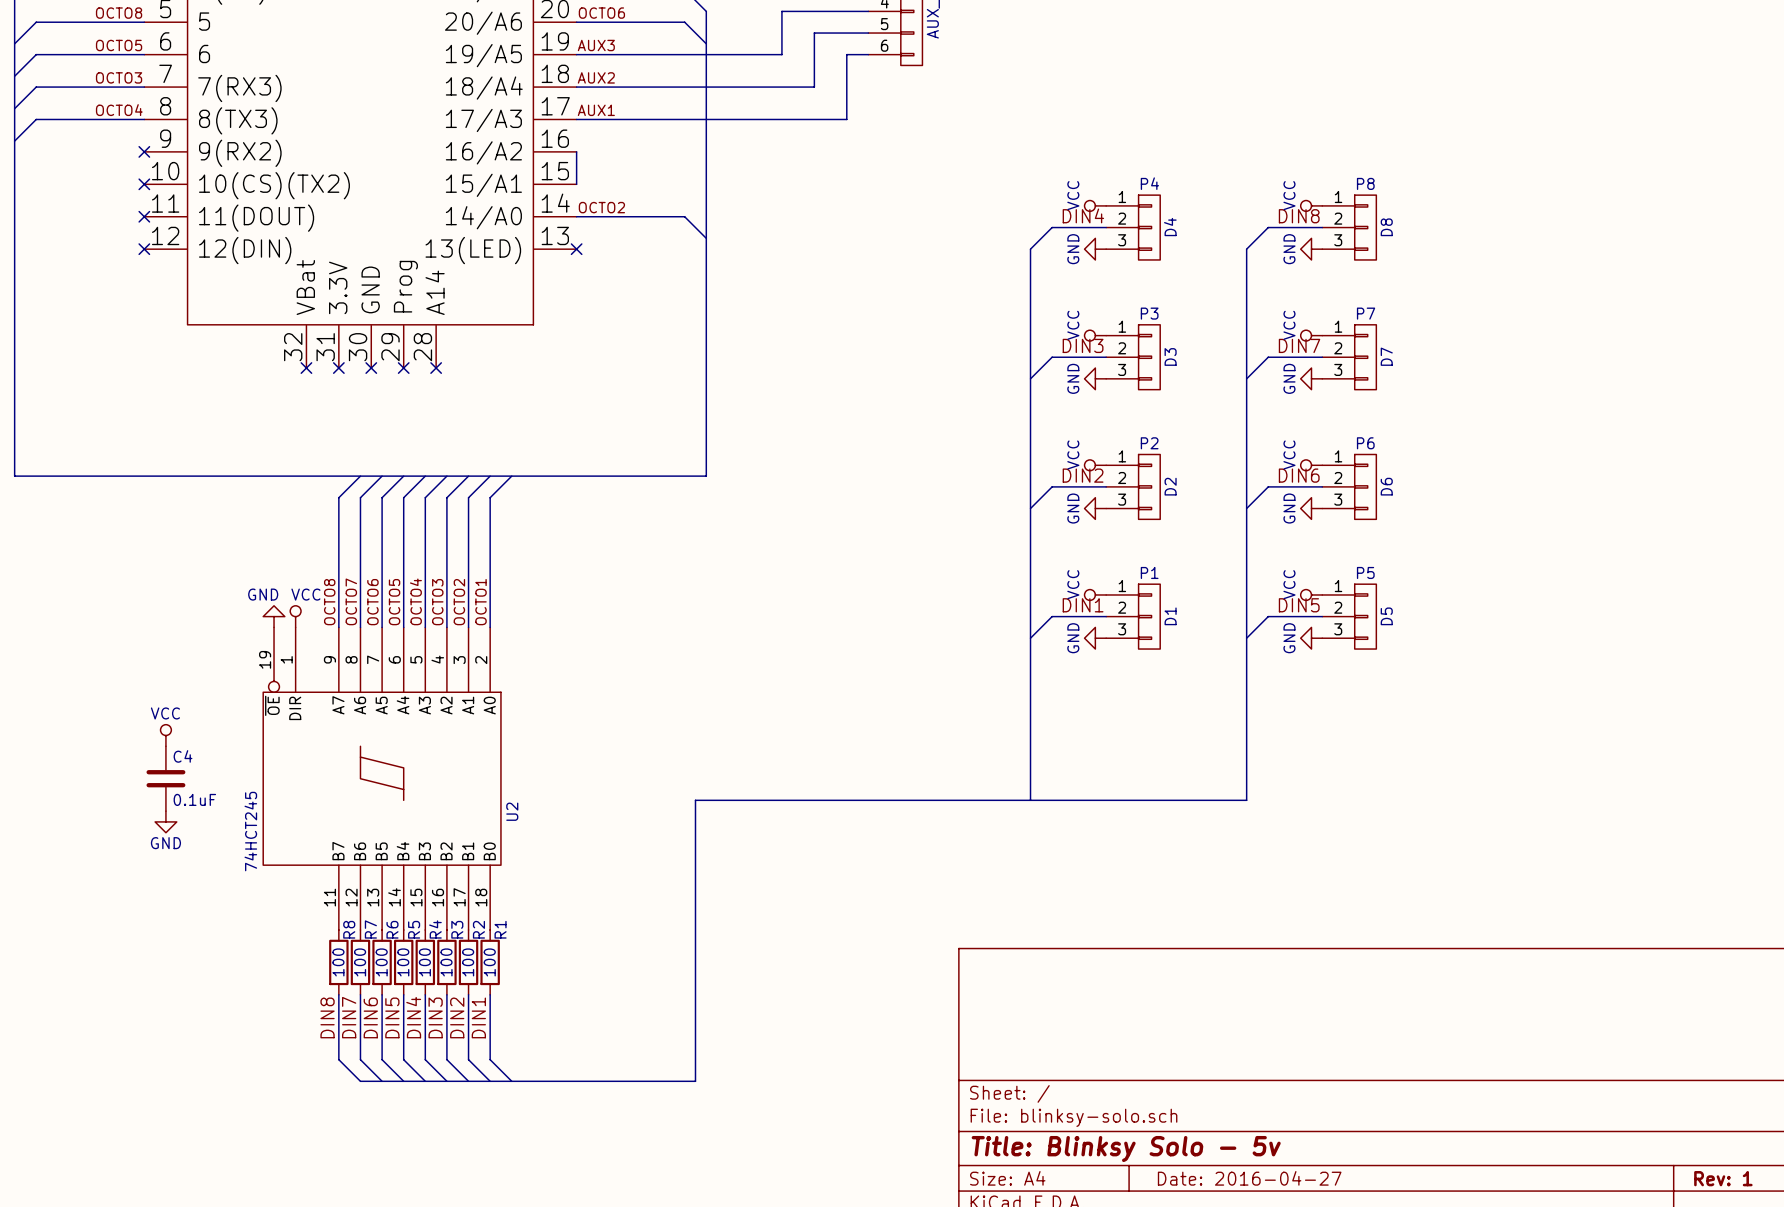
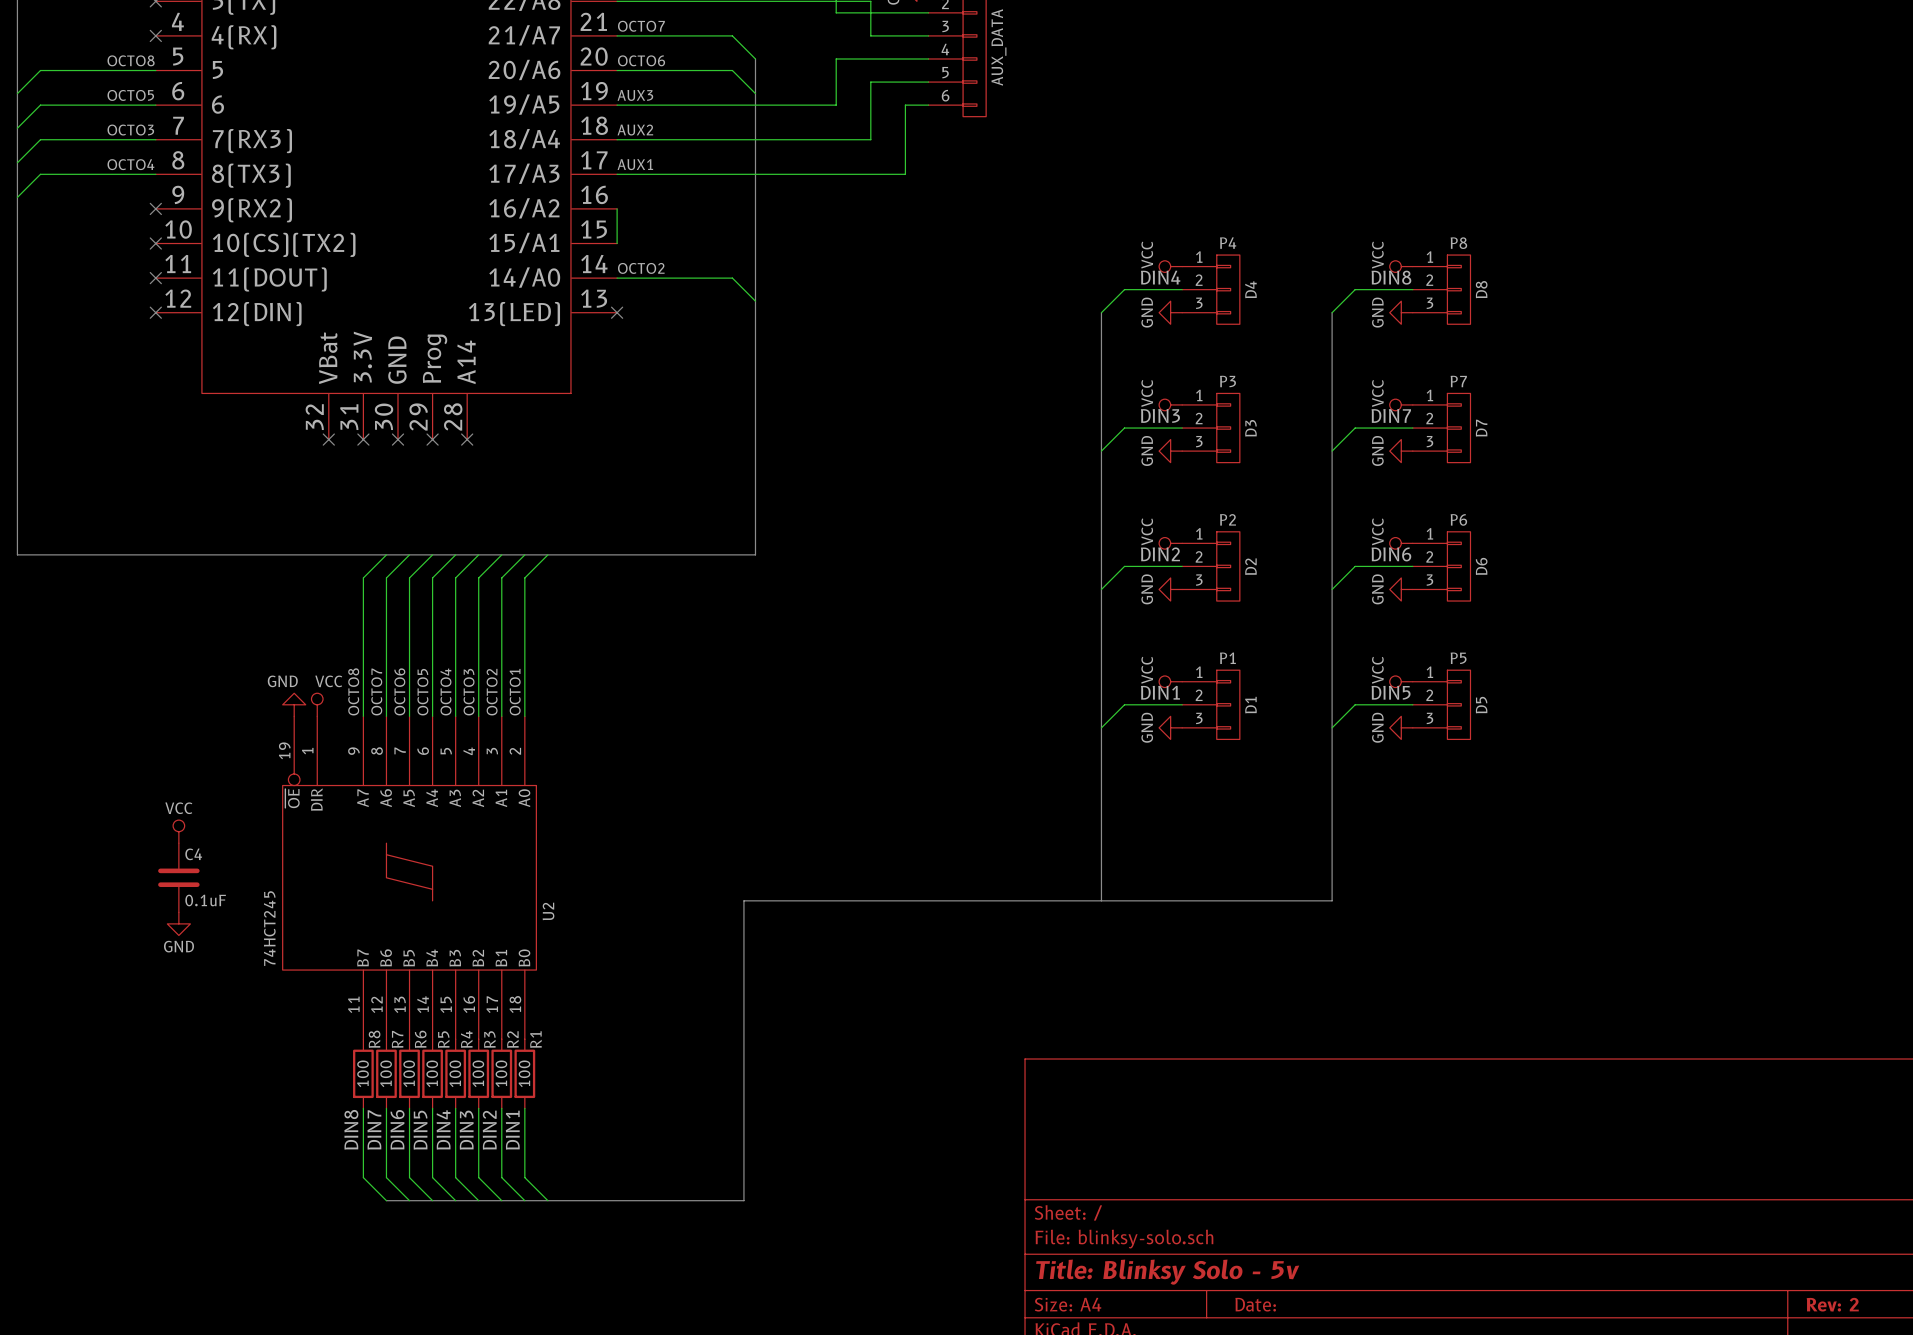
title block: Date: 2016-04-27 (1249, 1178) -> Date: (1255, 1304)
title block: Rev: 1 (1723, 1178) -> Rev: 2 (1832, 1304)

